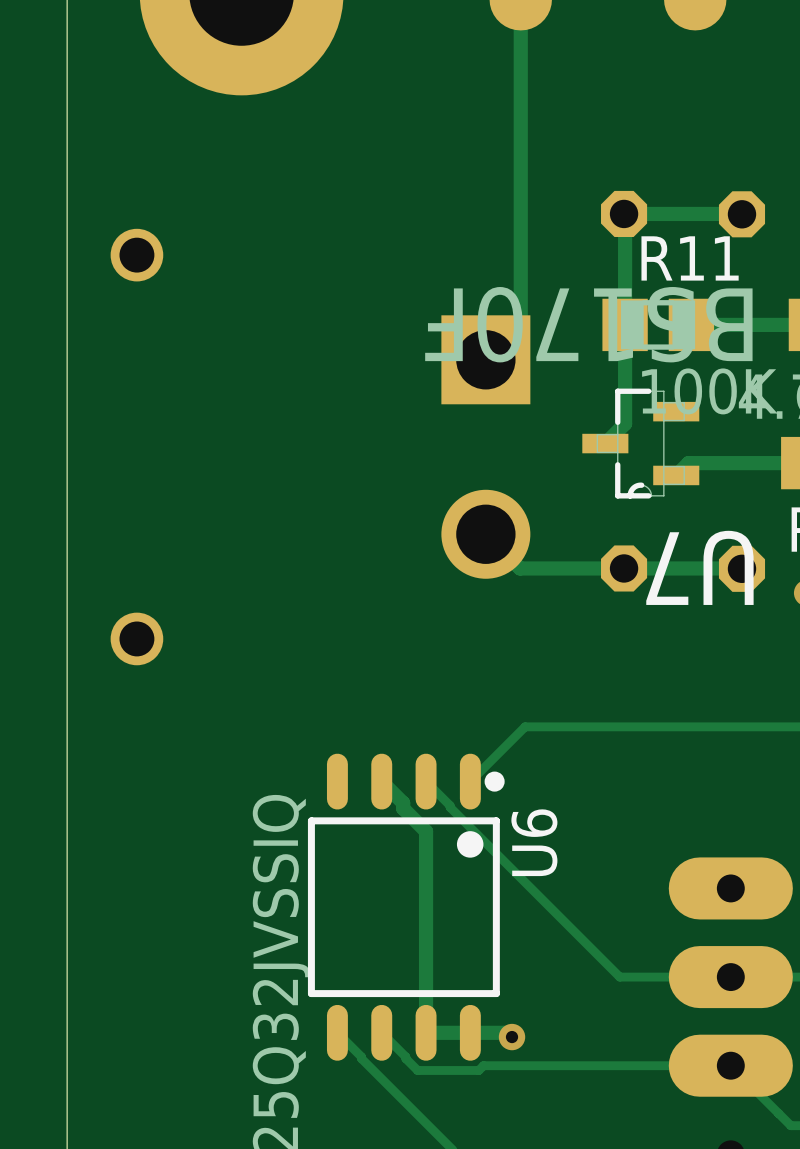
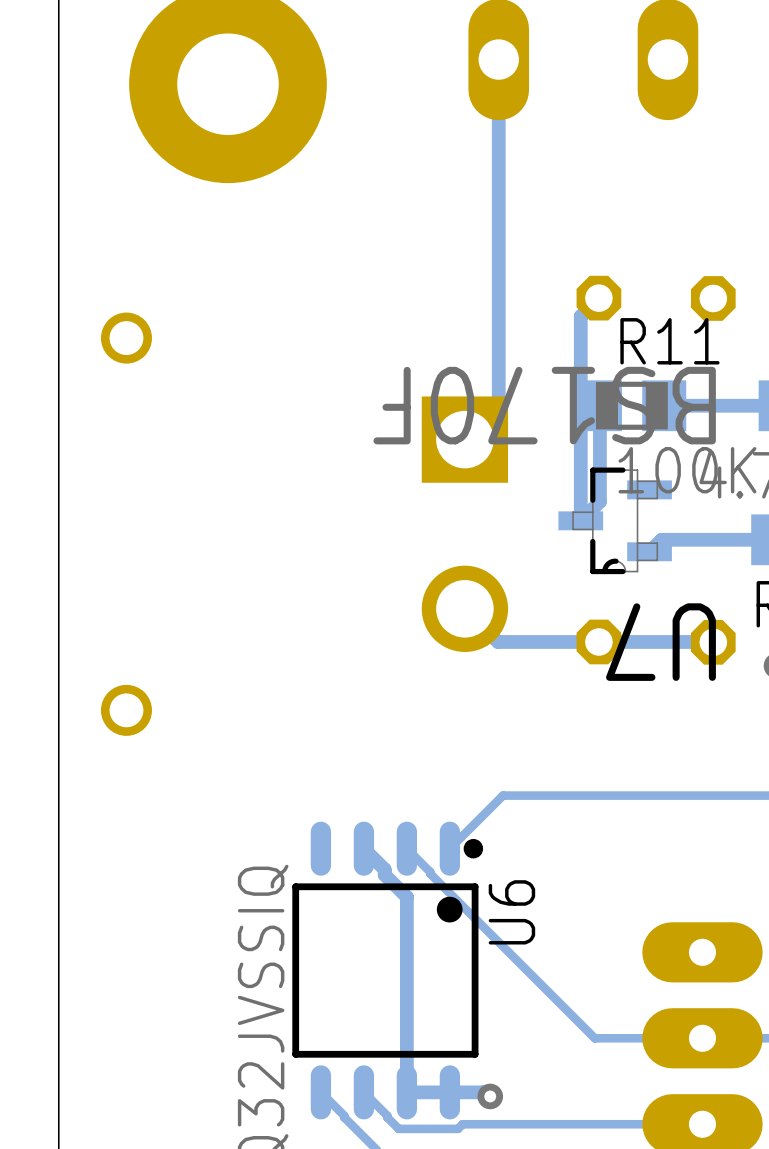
track: none -> (598, 298) (580, 316) (580, 520)
track: (741, 213) (624, 213) (625, 324) -> none

